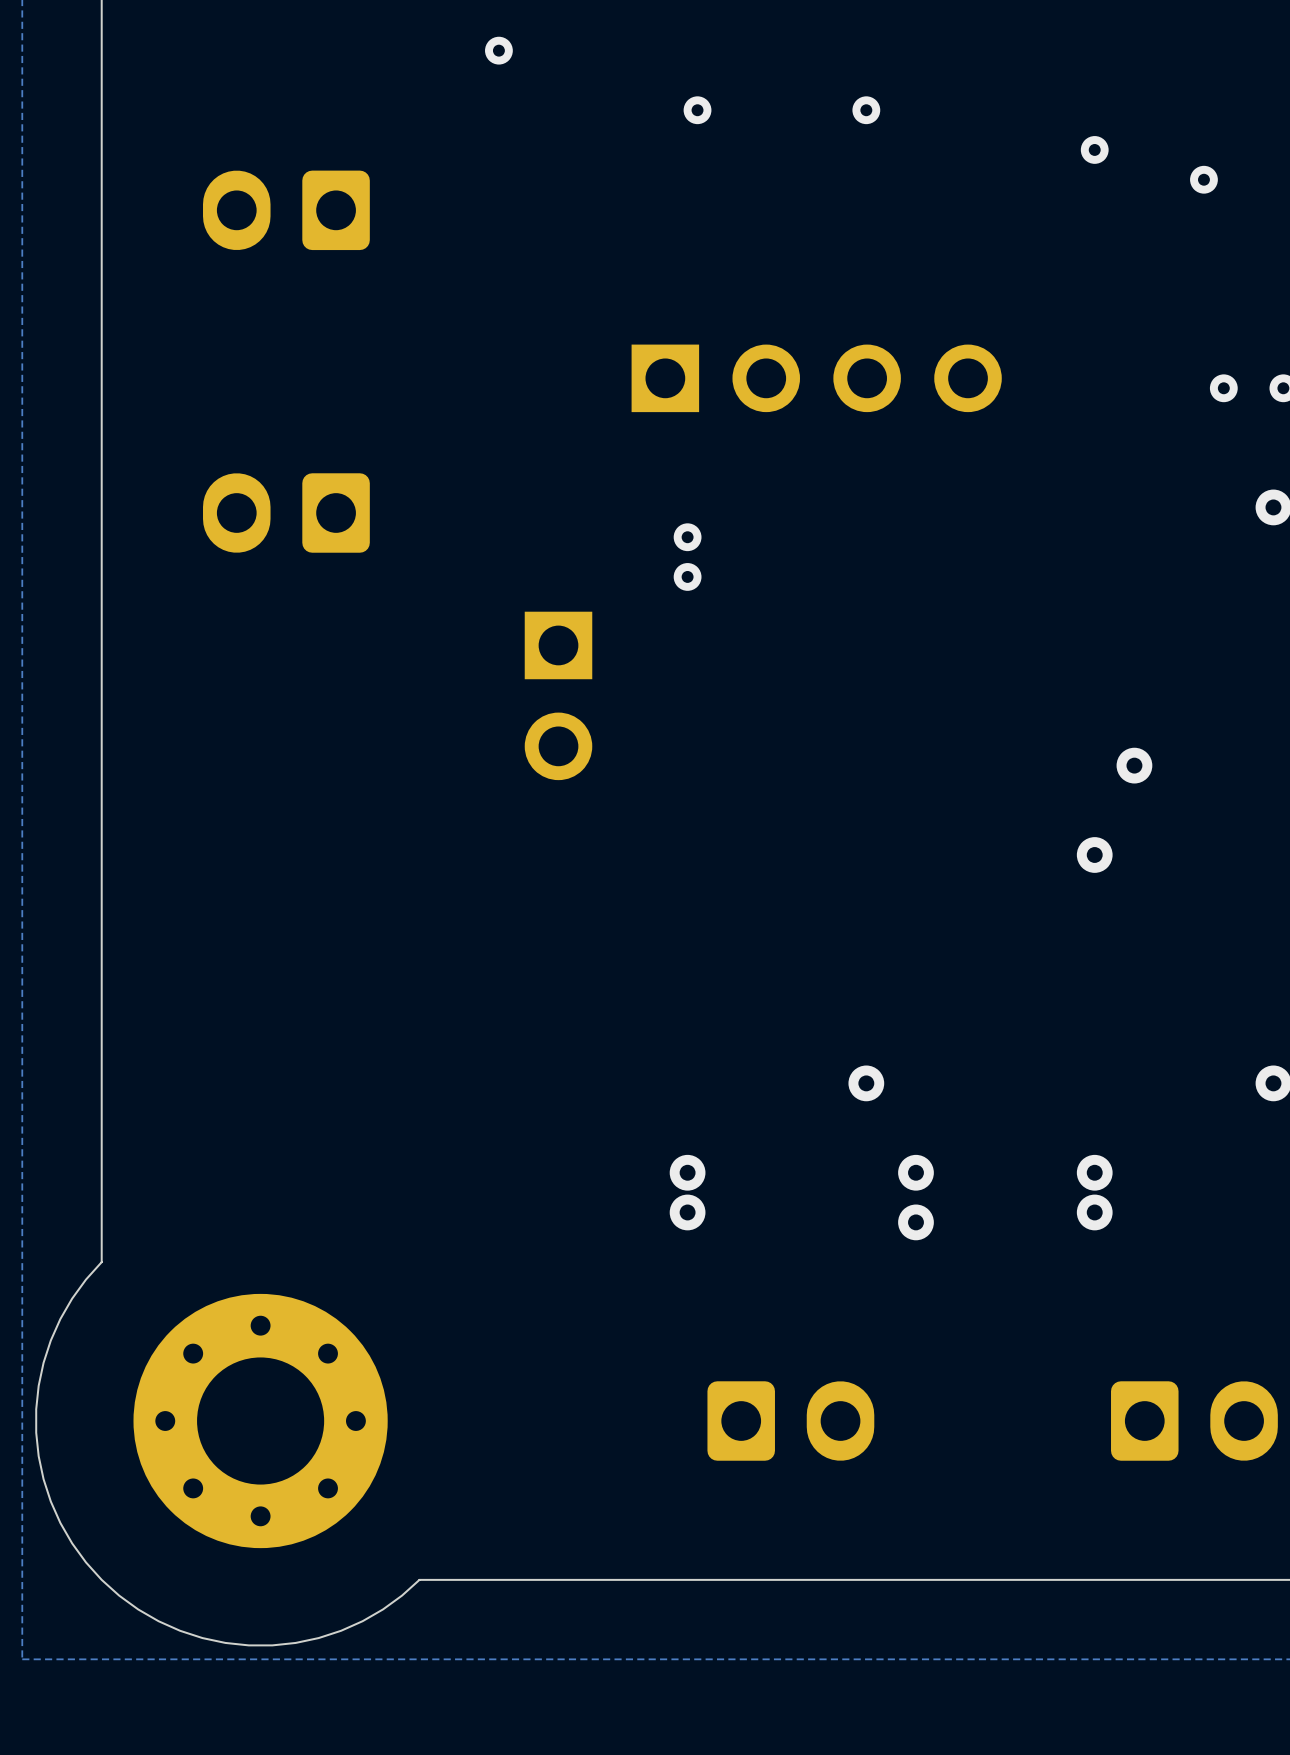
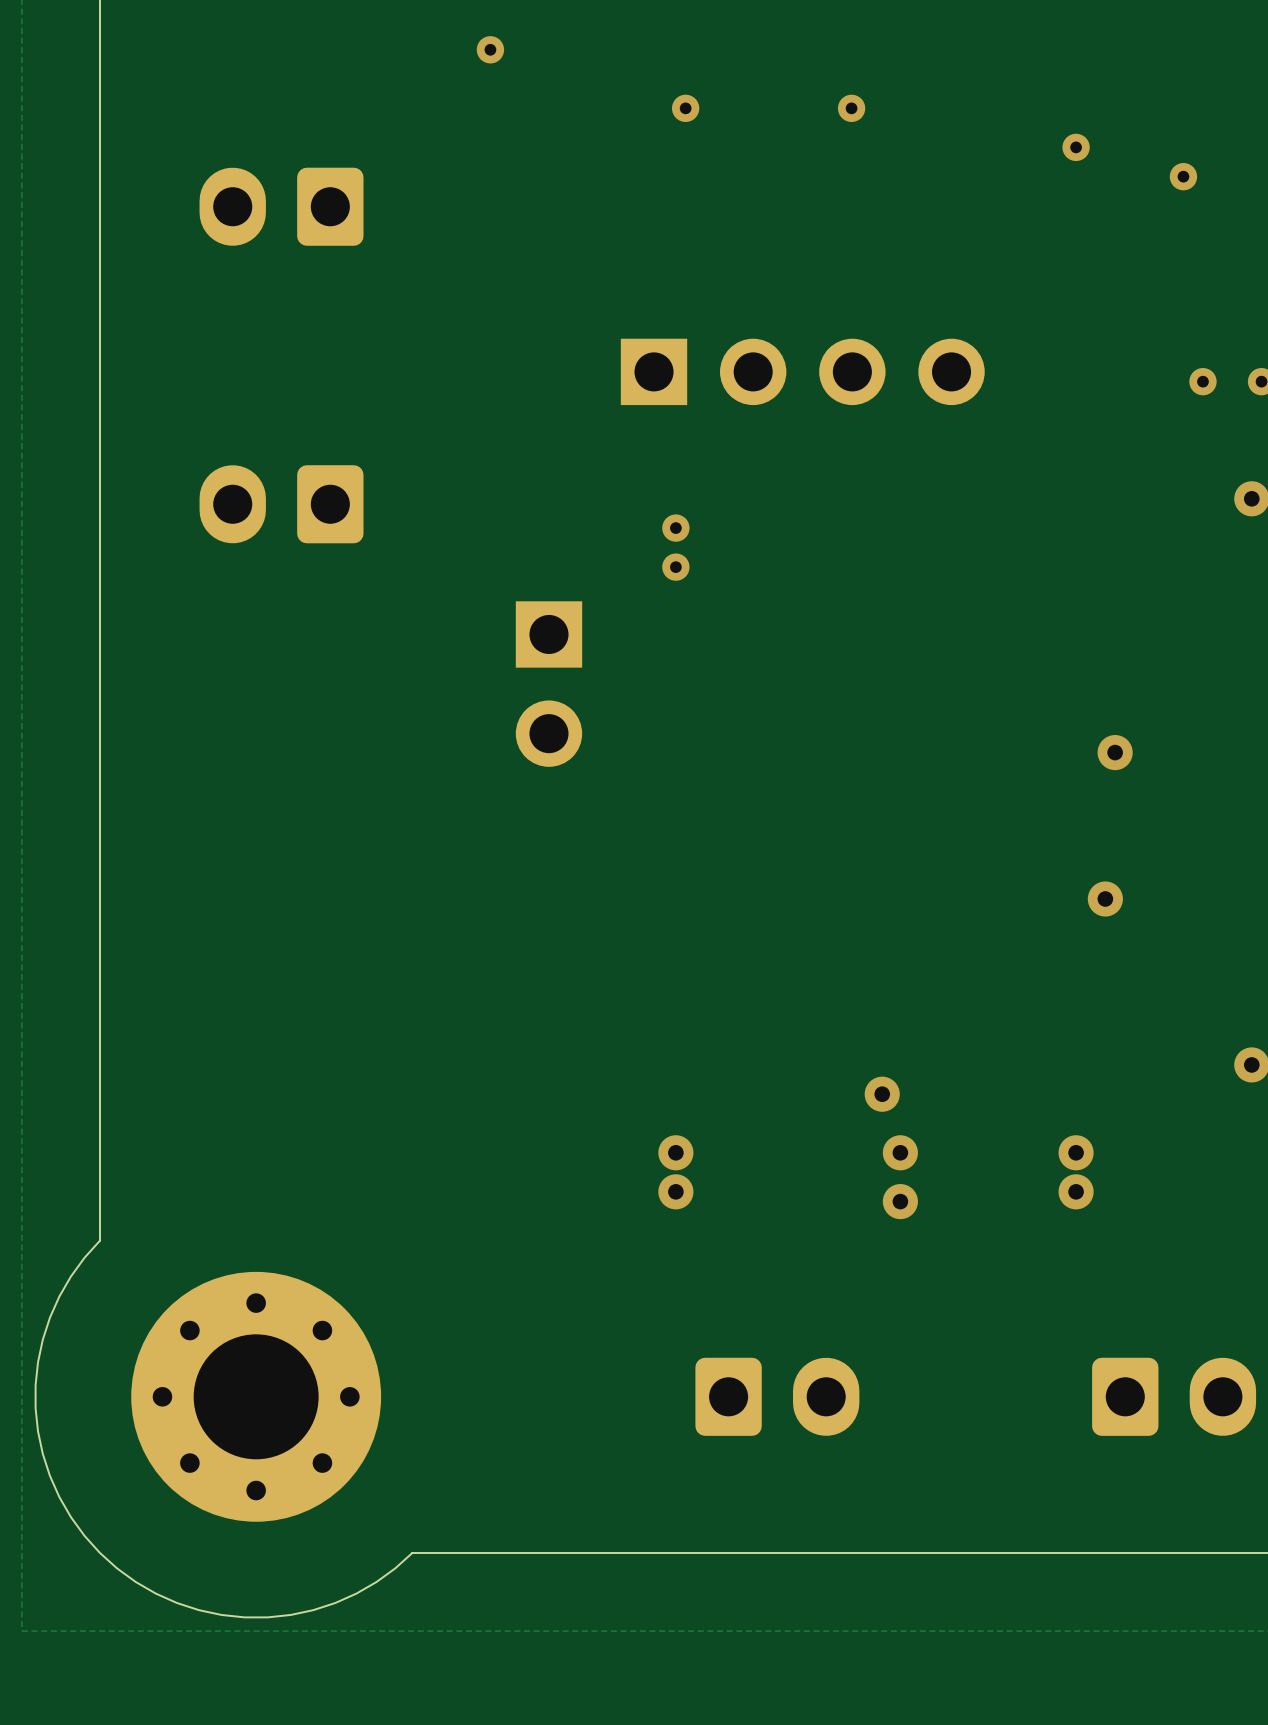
via position: (1094, 854) -> (1105, 899)
via position: (866, 1083) -> (882, 1094)

